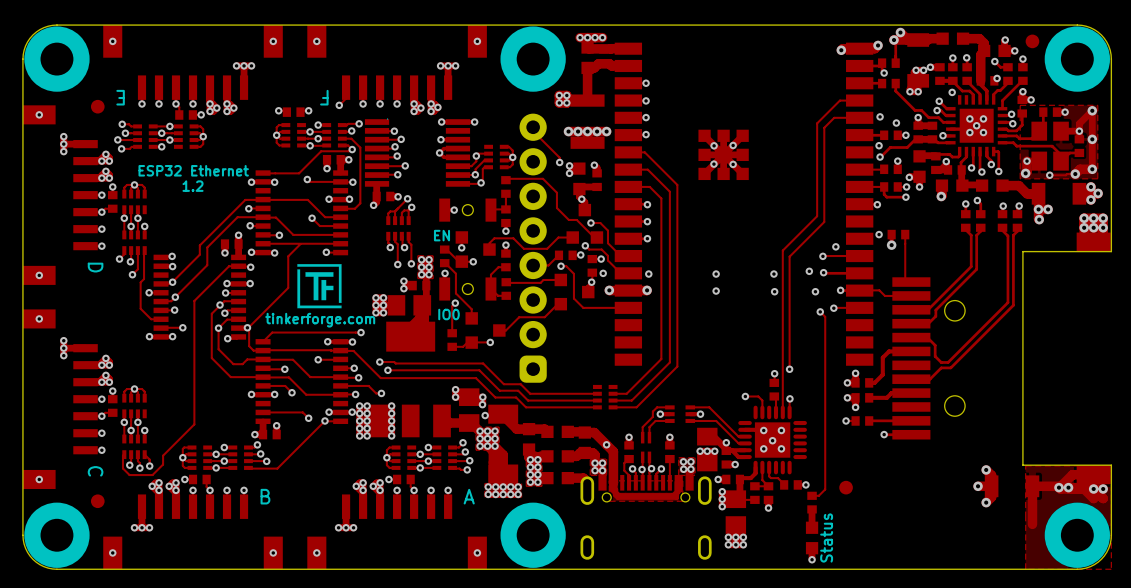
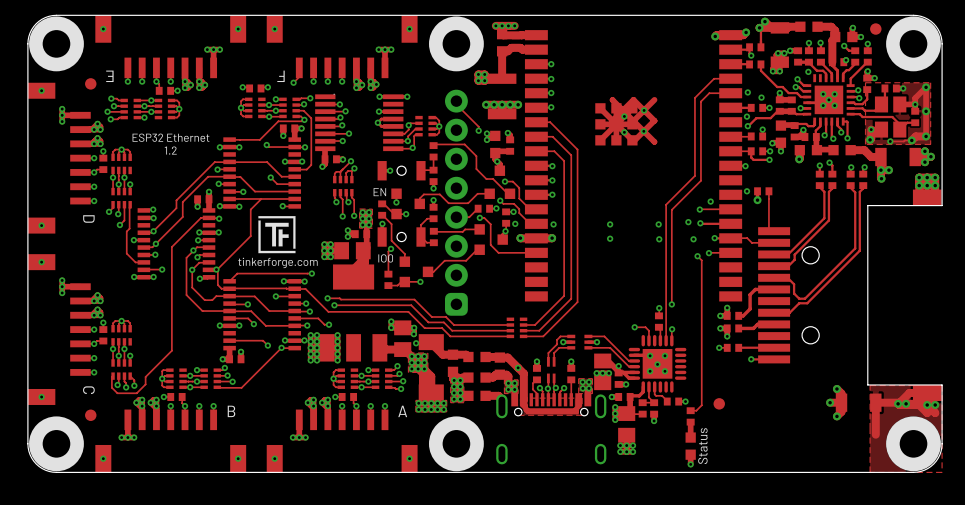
track: none -> (612, 100) (633, 120) (644, 110)
track: none -> (654, 99) (644, 110)
via: none -> (644, 110)
via: (714, 145) -> none
track: none -> (612, 120) (633, 99) (654, 120)
track: none -> (633, 121) (654, 141)
track: none -> (654, 120) (633, 141)
via: none -> (643, 131)
via: (713, 164) -> none

